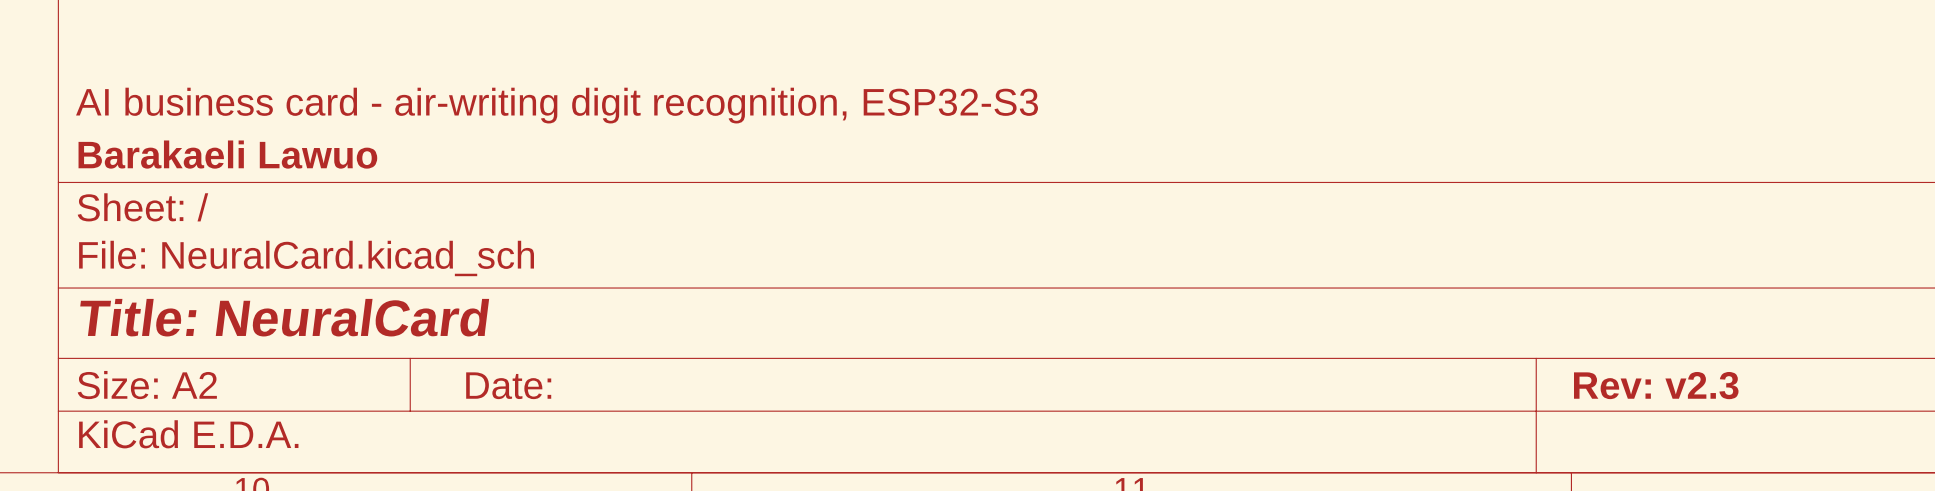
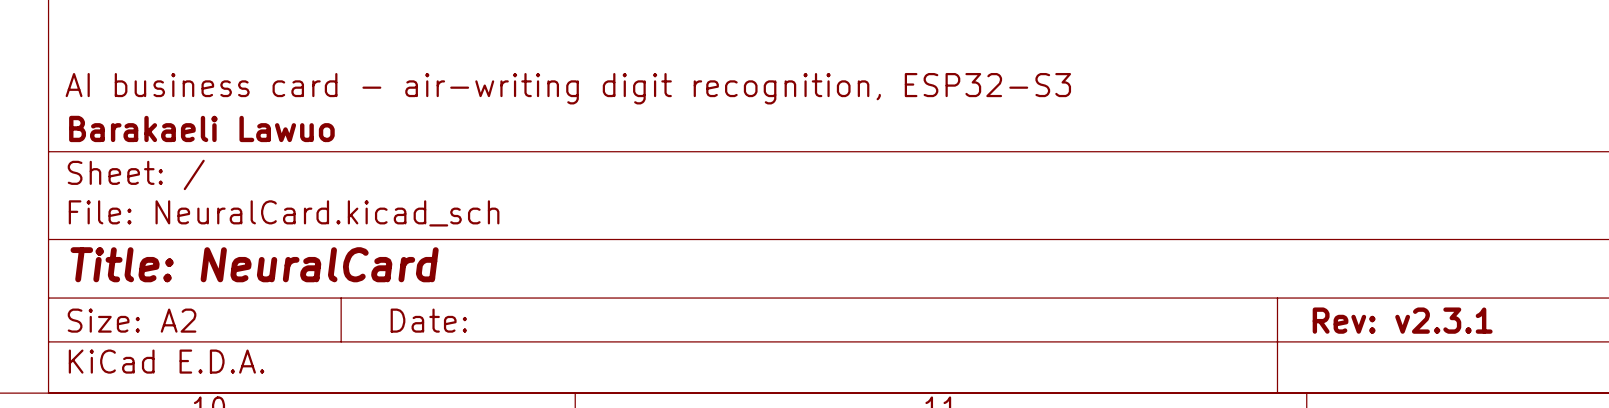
title block: Rev: v2.3 (1656, 385) -> Rev: v2.3.1 (1402, 320)

